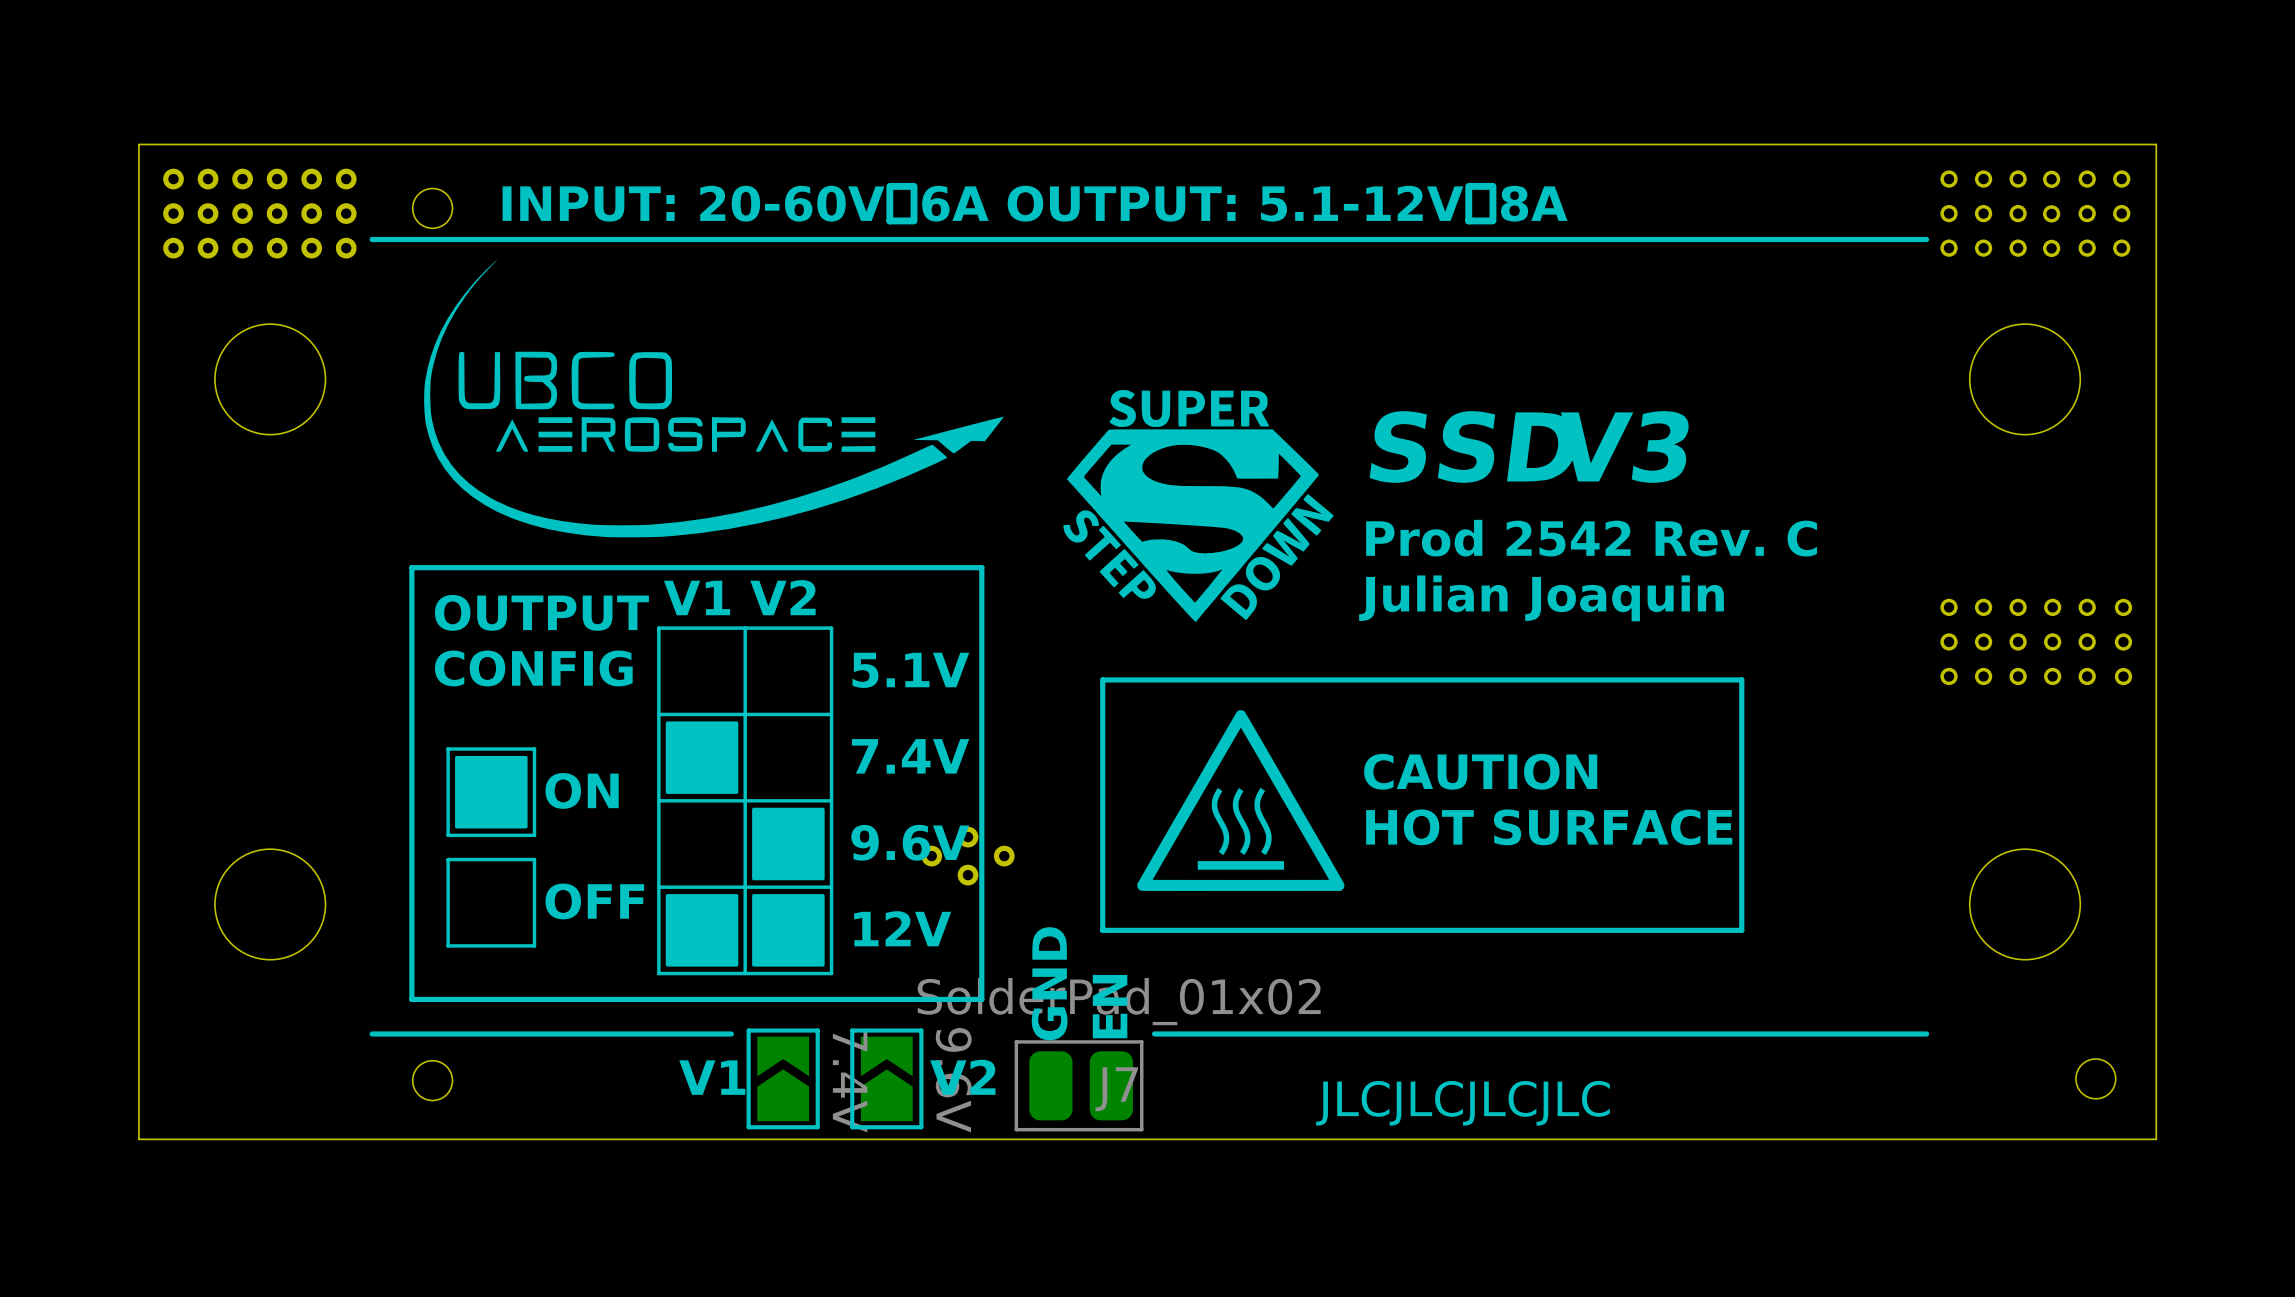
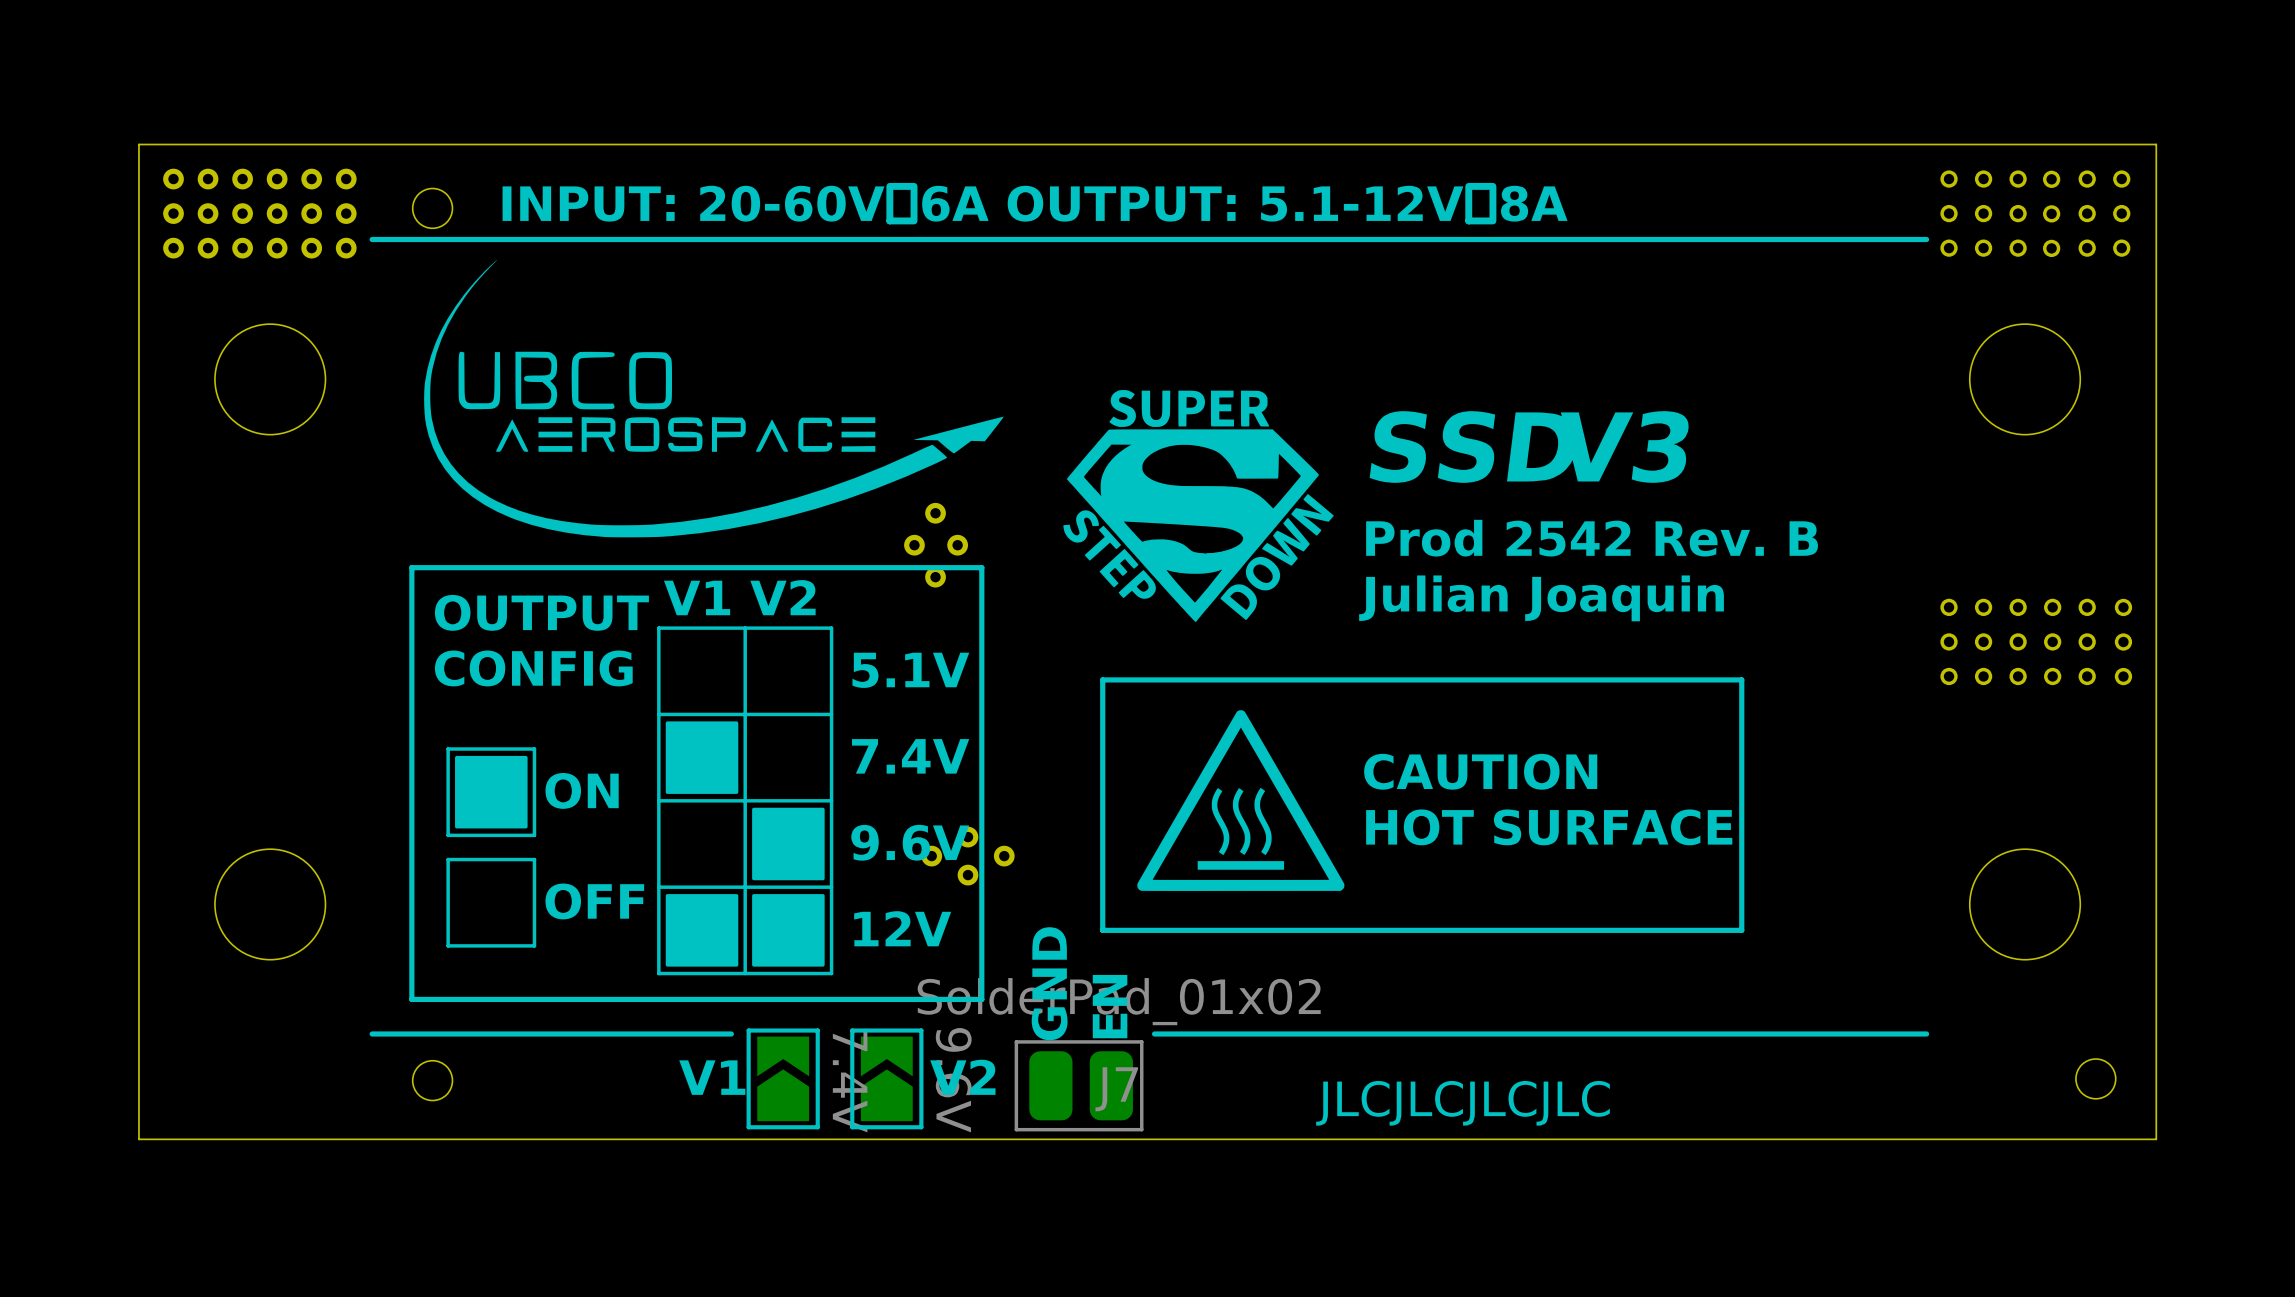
text: Prod 2542 Rev. C (1591, 538) -> Prod 2542 Rev. B (1592, 538)
part: none -> (936, 545)

